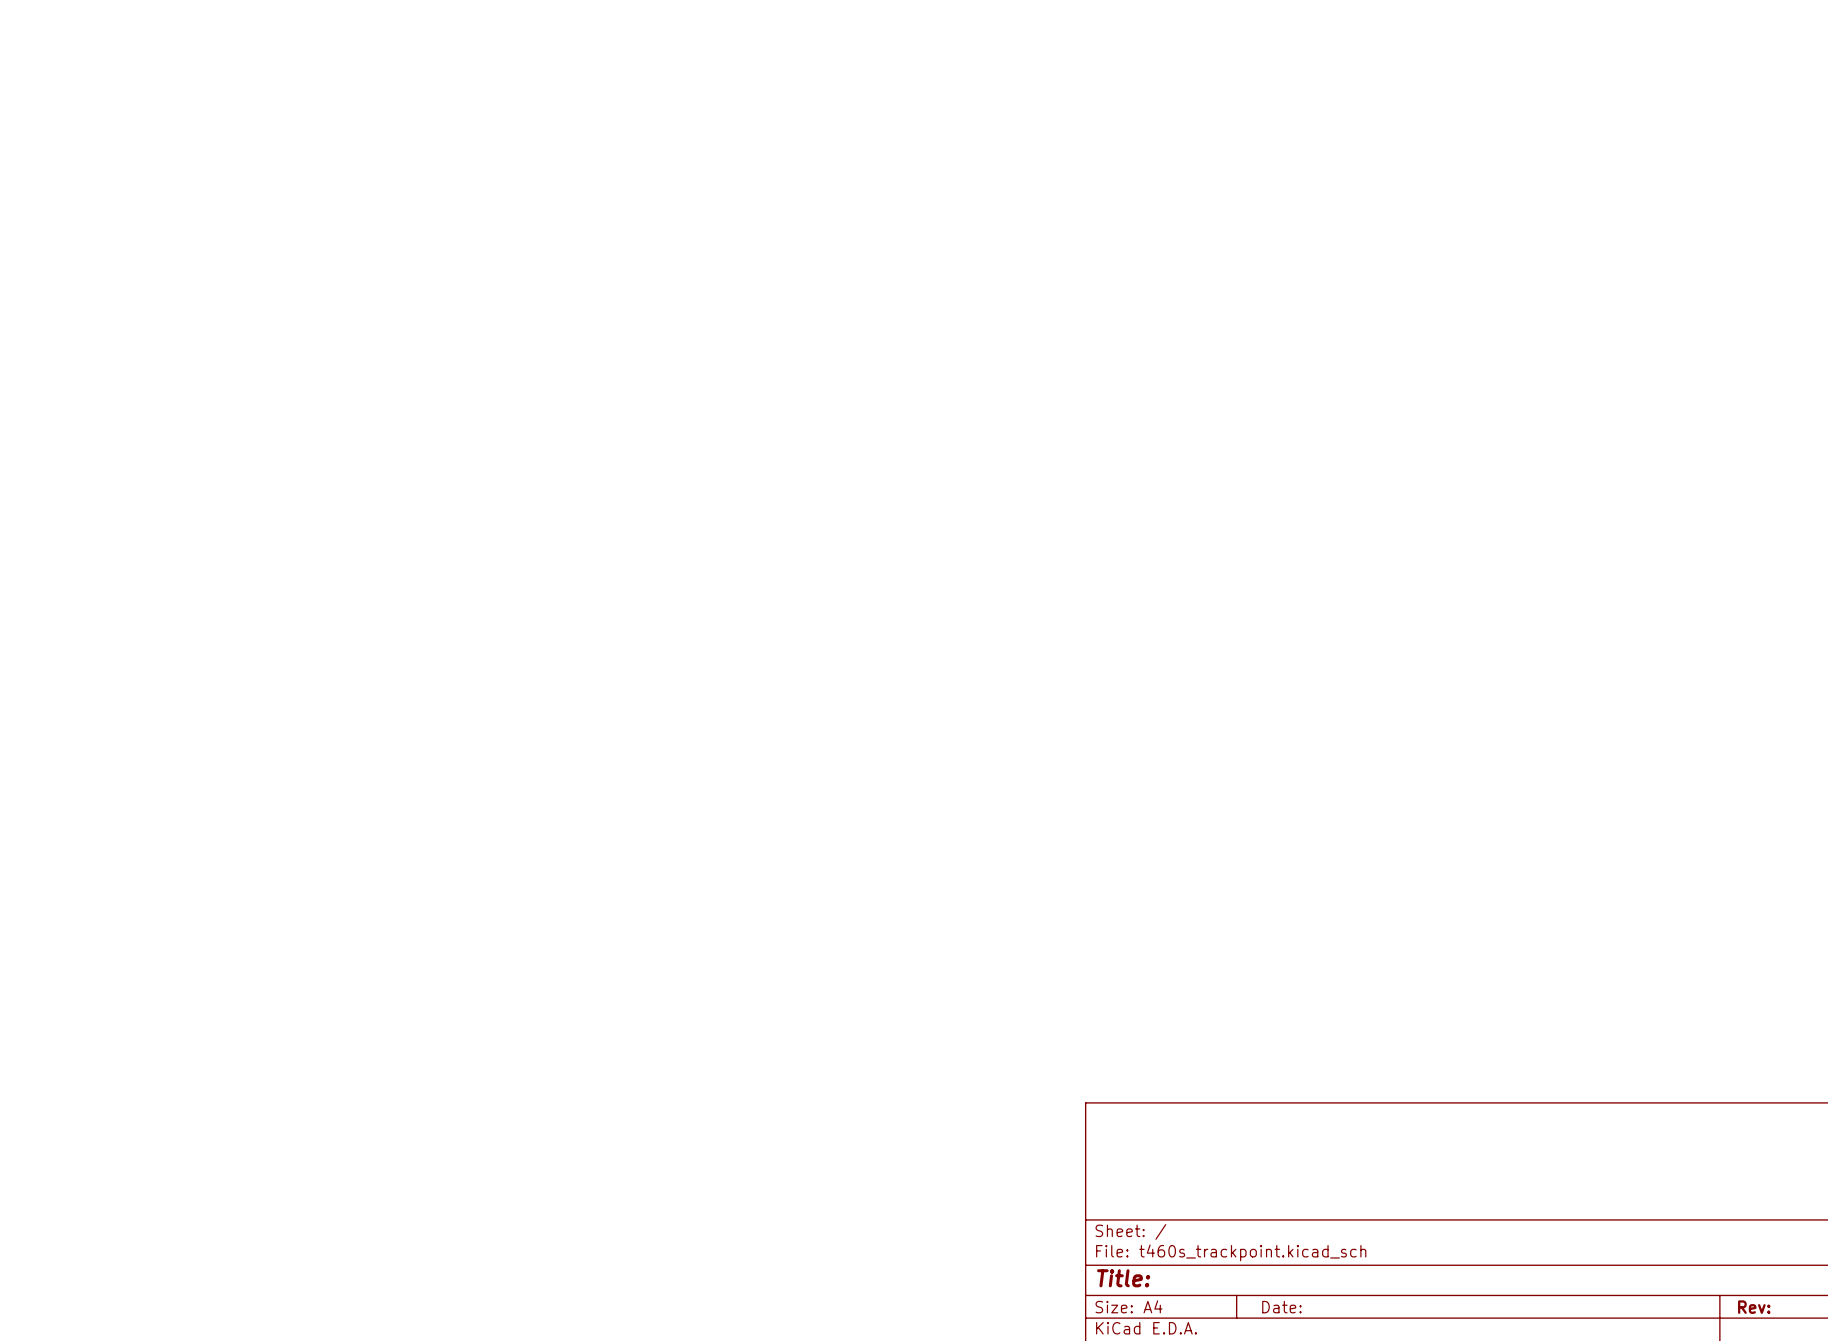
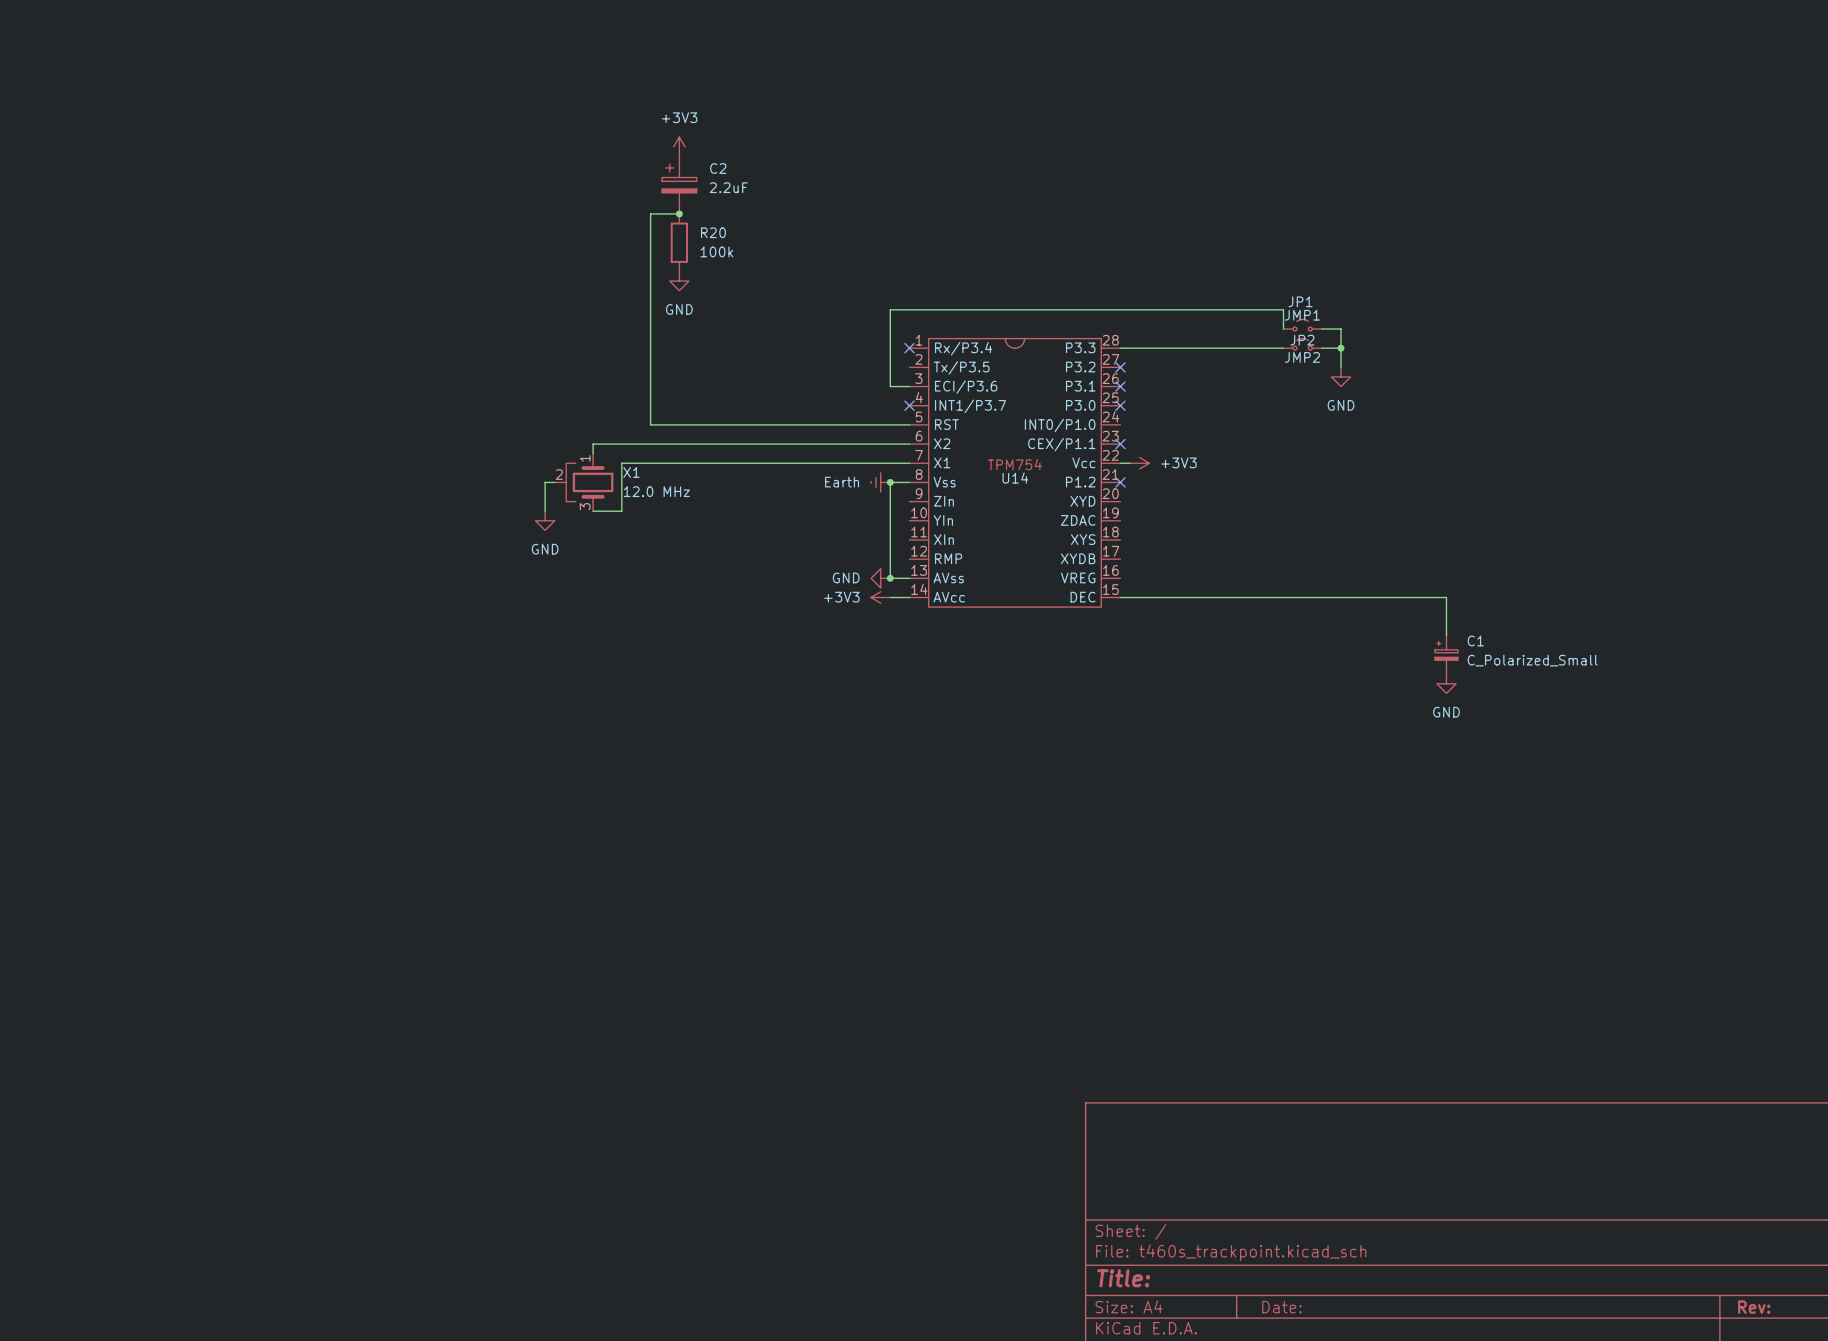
power symbol: none -> +3V3 (679, 146)
C2: none -> 2.2uF (679, 185)
wire: none -> (679, 213) (650, 213) (650, 424) (909, 424)
junction: none -> (679, 213)
R20: none -> 100k (679, 242)
power symbol: none -> GND (679, 281)
JP1: none -> JMP1 (1302, 325)
wire: none -> (1283, 329) (1283, 309) (890, 309) (890, 386) (909, 386)
wire: none -> (1321, 329) (1341, 329) (1341, 367)
JP2: none -> JMP2 (1302, 344)
no-connect mark: none -> (909, 348)
wire: none -> (1120, 348) (1283, 348)
wire: none -> (1321, 348) (1341, 348)
junction: none -> (1341, 348)
no-connect mark: none -> (1120, 367)
power symbol: none -> GND (1341, 376)
no-connect mark: none -> (1120, 386)
no-connect mark: none -> (909, 405)
no-connect mark: none -> (1120, 405)
wire: none -> (909, 444) (593, 444) (593, 453)
no-connect mark: none -> (1120, 444)
wire: none -> (909, 463) (621, 463) (621, 511) (593, 511)
wire: none -> (1120, 463) (1130, 463)
power symbol: none -> +3V3 (1139, 463)
U14: none -> (1014, 472)
wire: none -> (554, 482) (545, 482) (545, 511)
X1: none -> 12.0 MHz (584, 482)
power symbol: none -> Earth (880, 482)
junction: none -> (890, 482)
wire: none -> (909, 482) (890, 482) (890, 578) (909, 578)
no-connect mark: none -> (1120, 482)
power symbol: none -> GND (545, 520)
power symbol: none -> GND (880, 578)
junction: none -> (890, 578)
power symbol: none -> +3V3 (880, 597)
wire: none -> (890, 597) (909, 597)
wire: none -> (1120, 597) (1446, 597) (1446, 635)
C1: none -> C_Polarized_Small (1446, 655)
power symbol: none -> GND (1446, 683)

